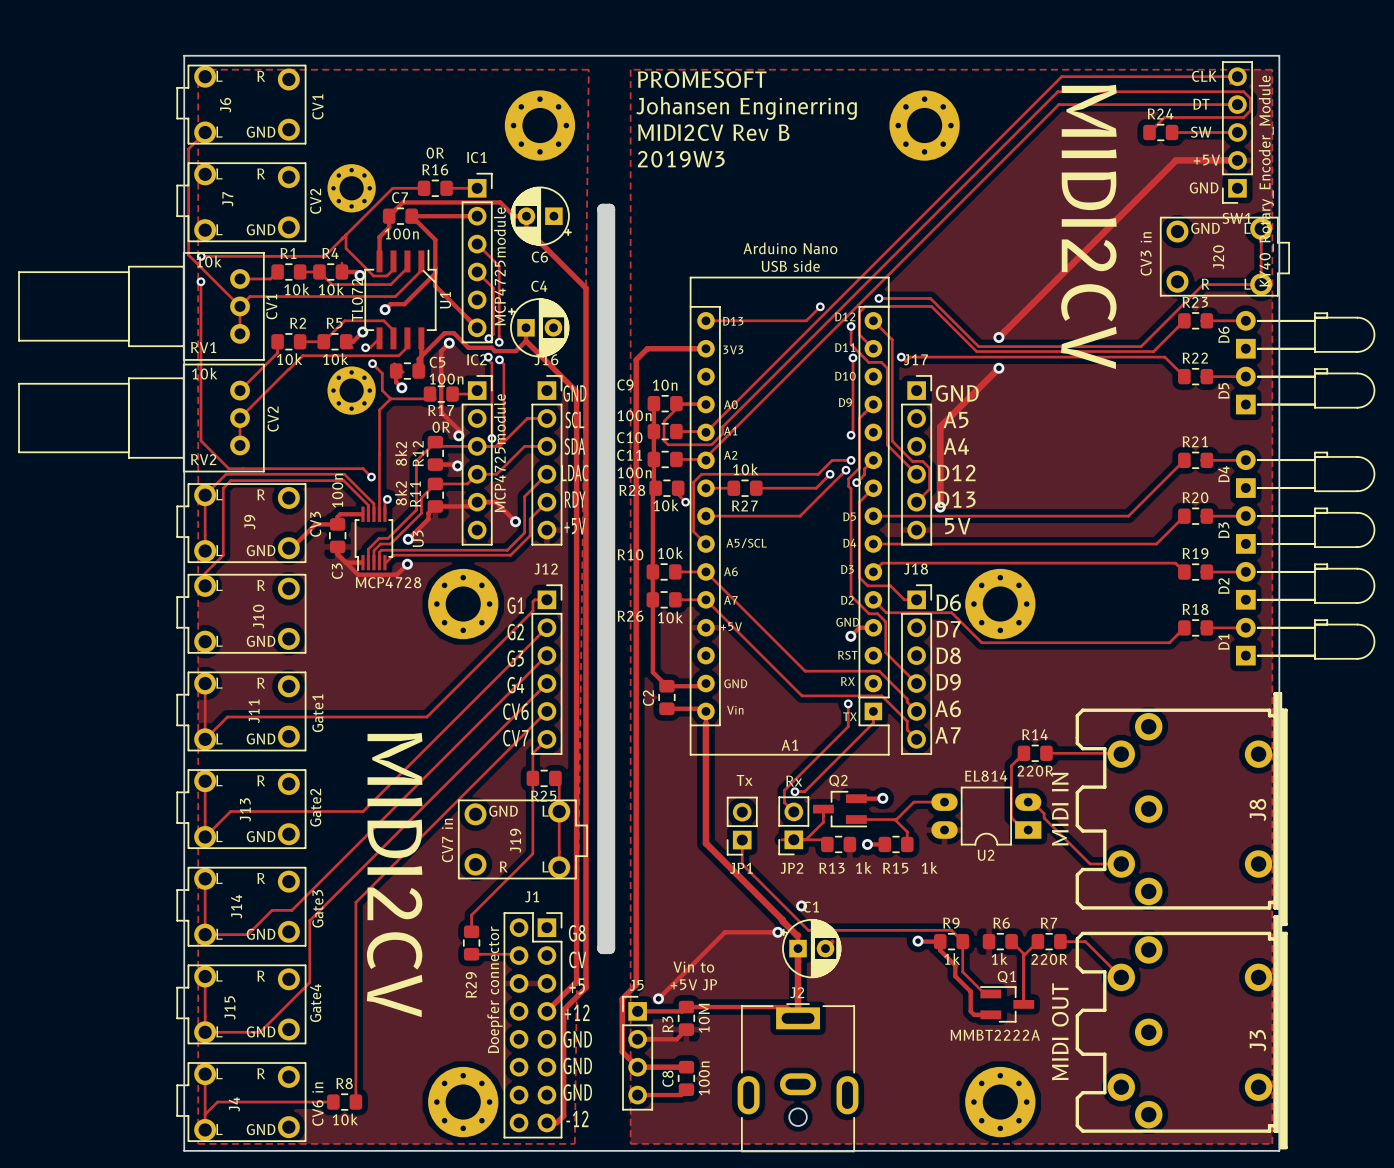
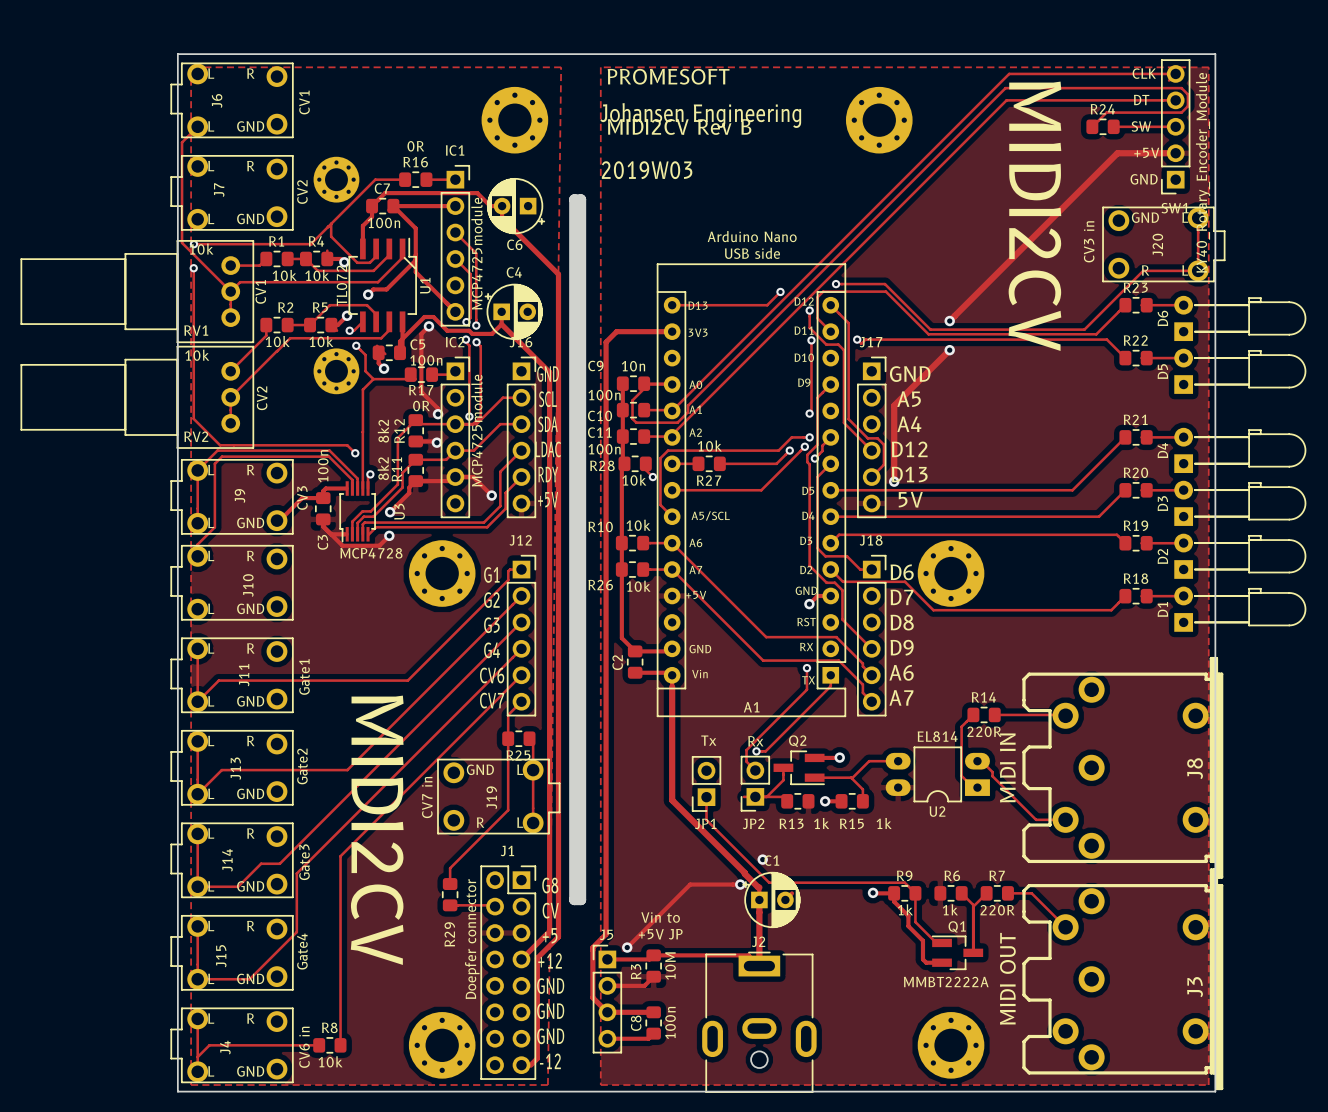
text: Johansen Enginerring (746, 108) -> Johansen Engineering (700, 115)
text: 2019W3 (681, 159) -> 2019W03 (647, 170)

